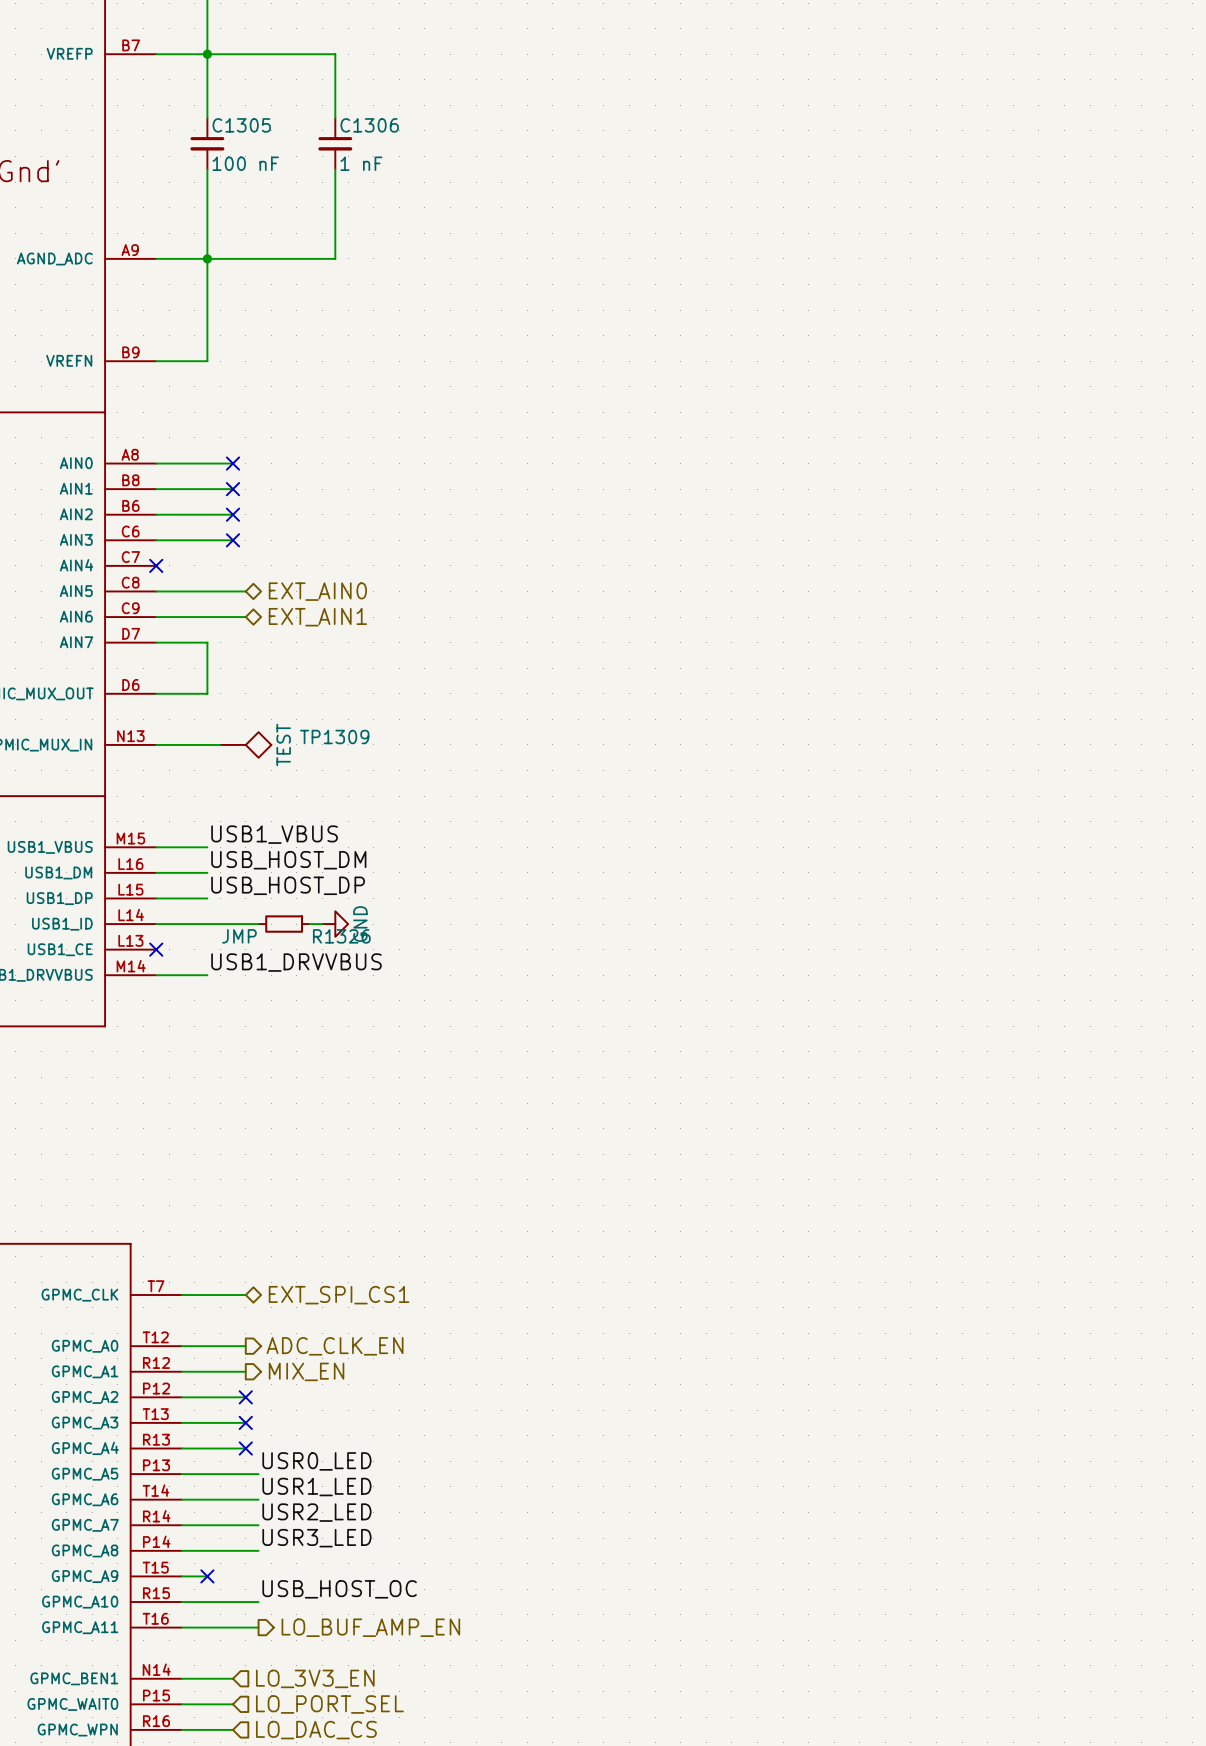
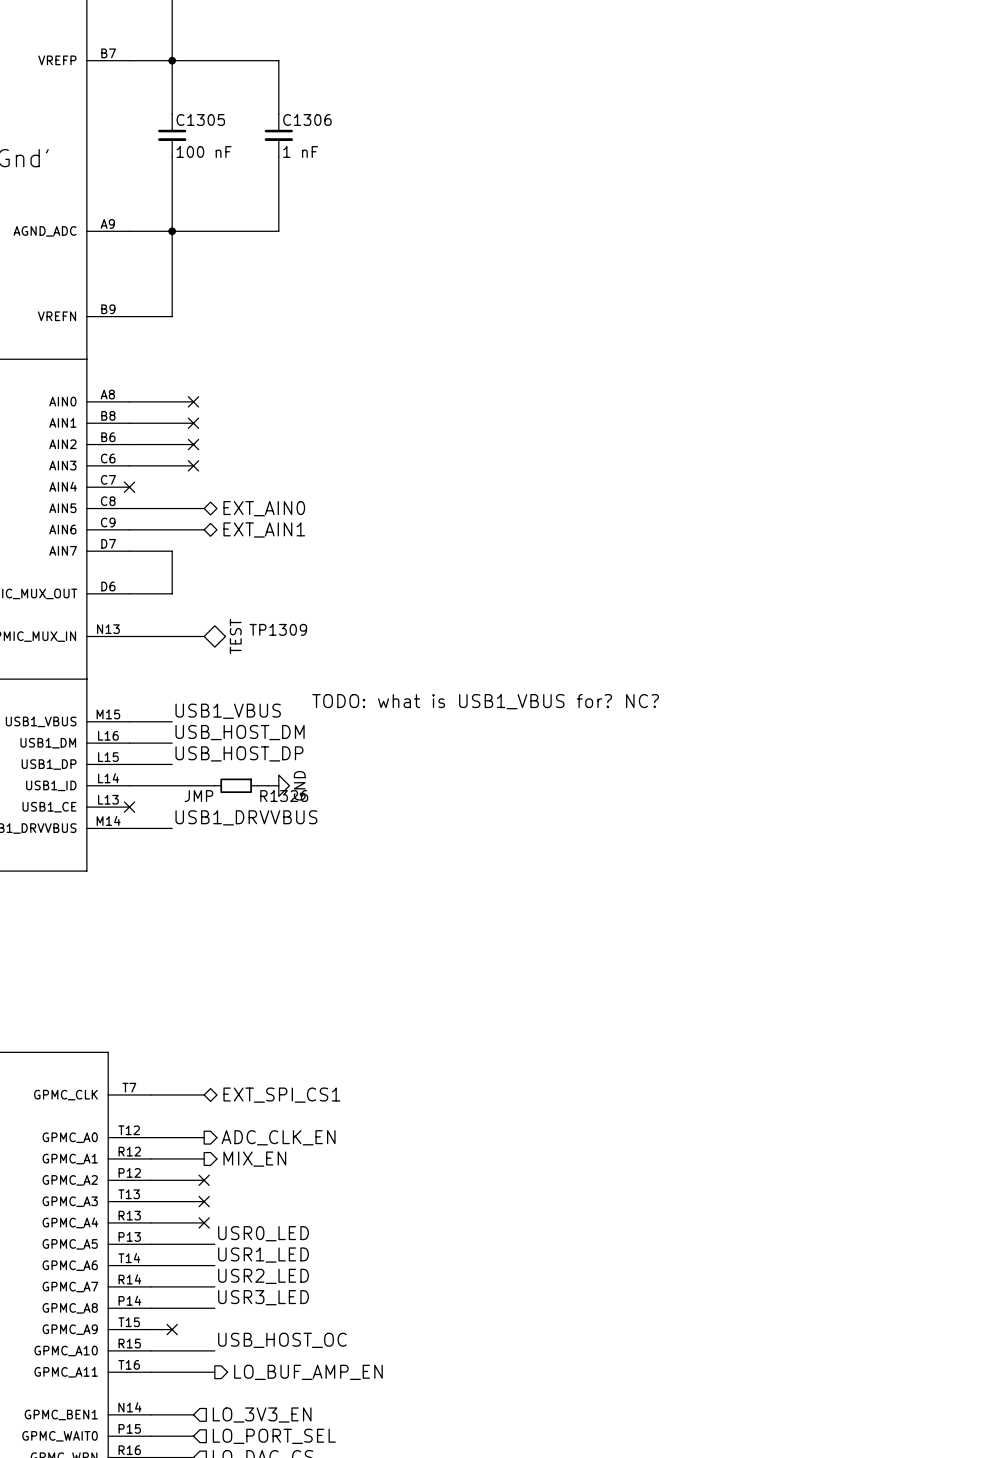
text: none -> TODO: what is USB1_VBUS for? NC? (485, 701)

